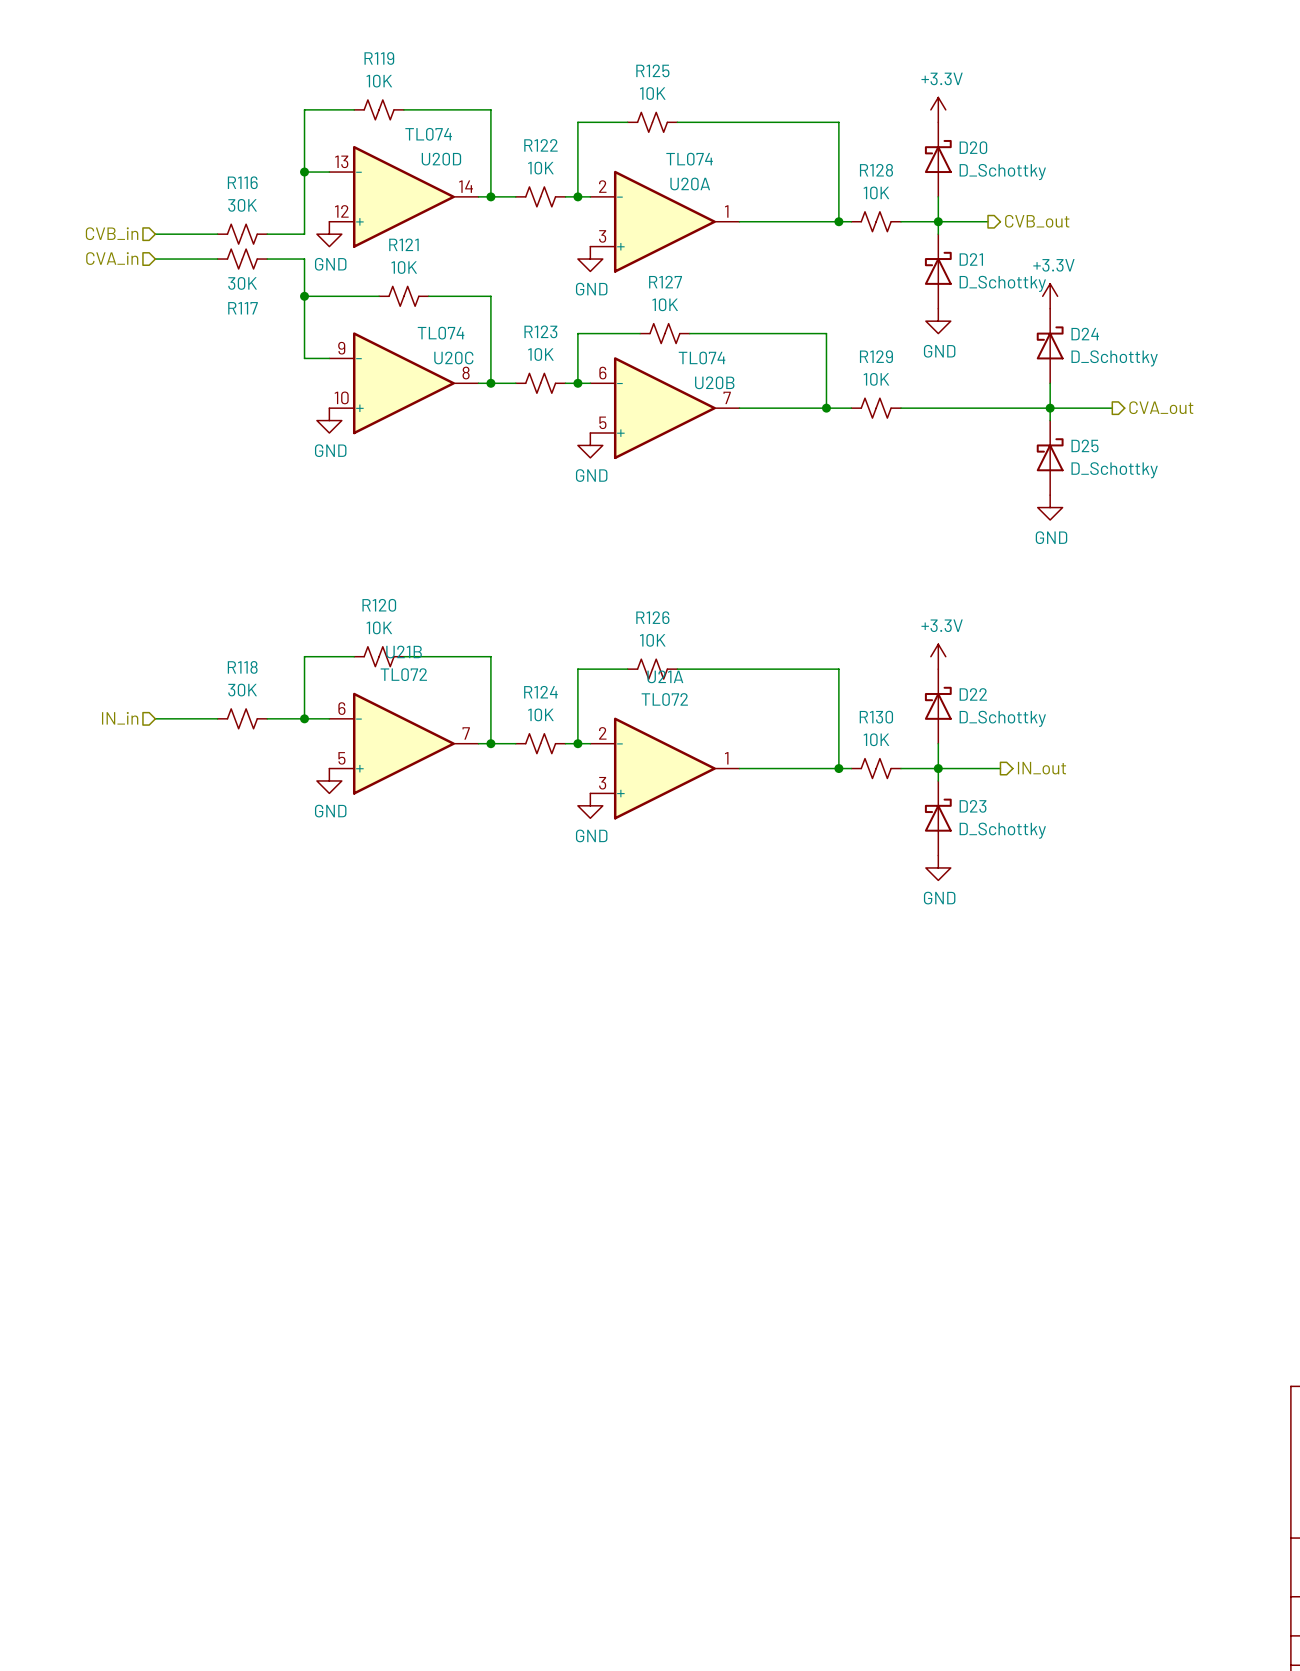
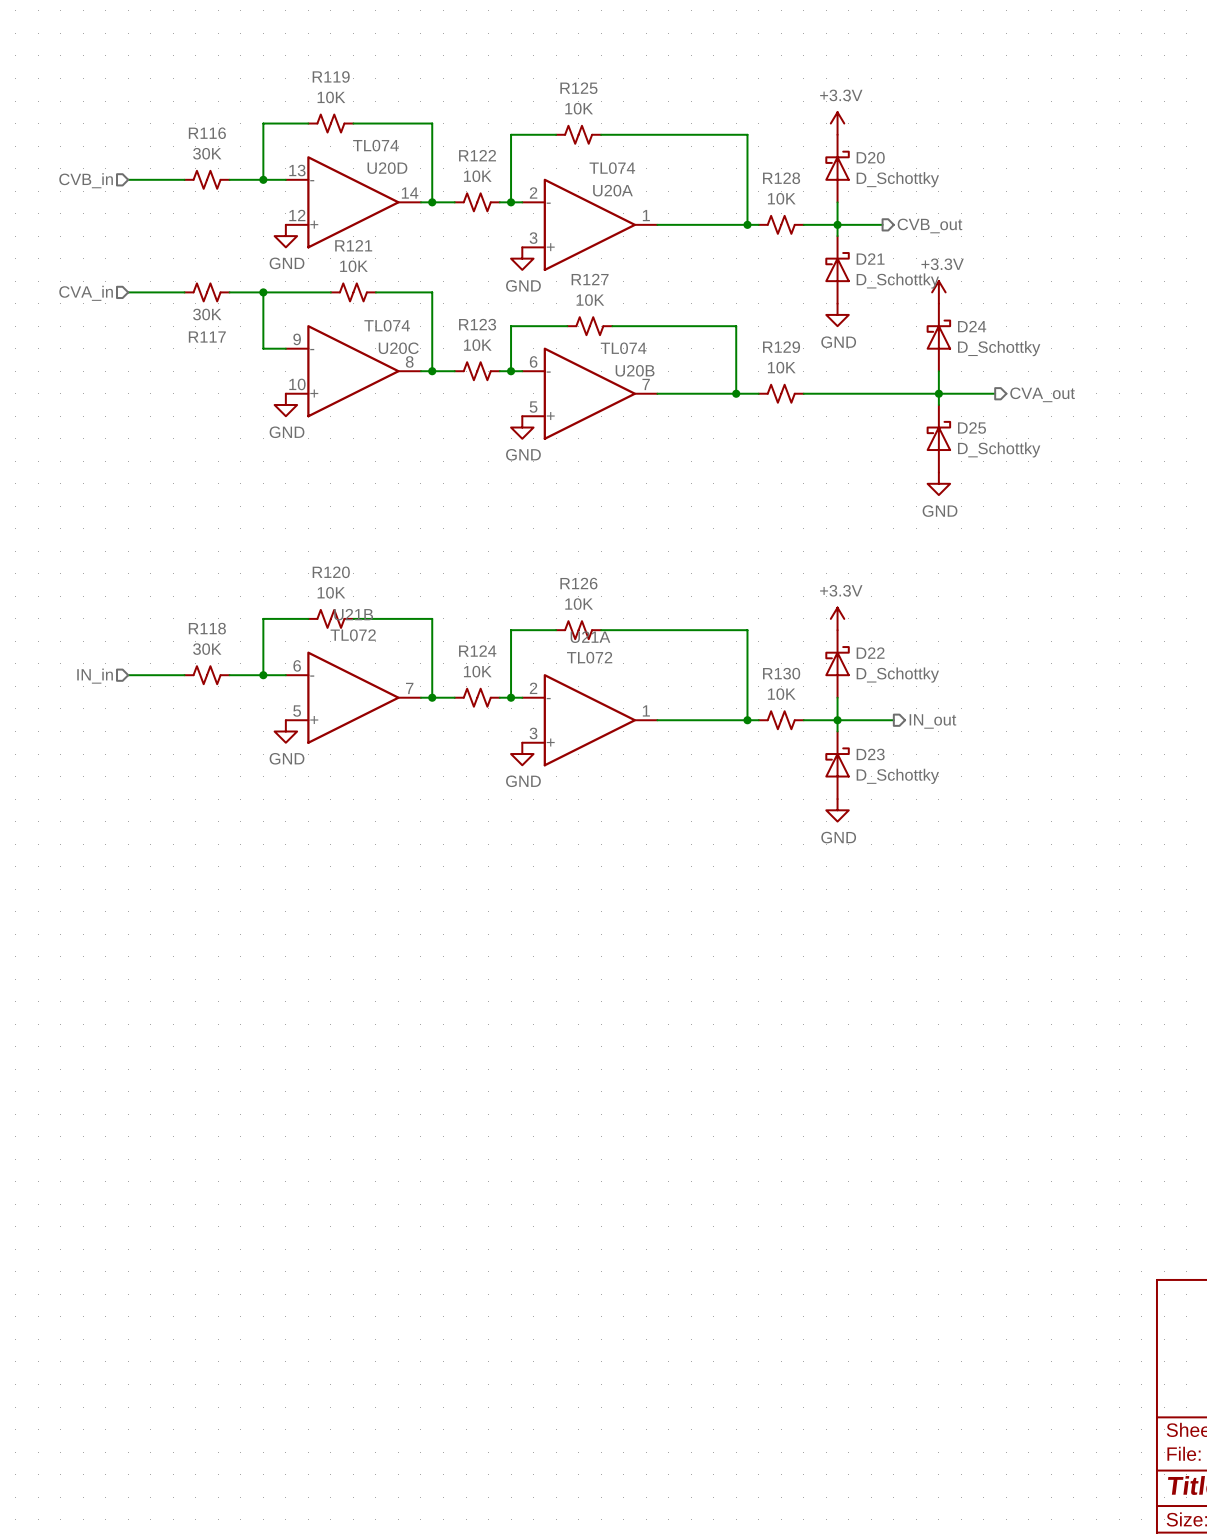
wire: (304, 172) (304, 234) (267, 234) -> (263, 179) (229, 179)
hierarchical label position: CVB_in (112, 233) -> CVB_in (86, 180)
wire: (155, 234) (217, 234) -> (128, 179) (184, 179)
R116 position: (242, 234) -> (207, 179)
hierarchical label position: CVA_in (112, 258) -> CVA_in (86, 293)
wire: (155, 259) (217, 259) -> (128, 292) (184, 292)
R117 position: (242, 259) -> (207, 292)
wire: (267, 259) (304, 259) (304, 296) -> (229, 292) (263, 292)

